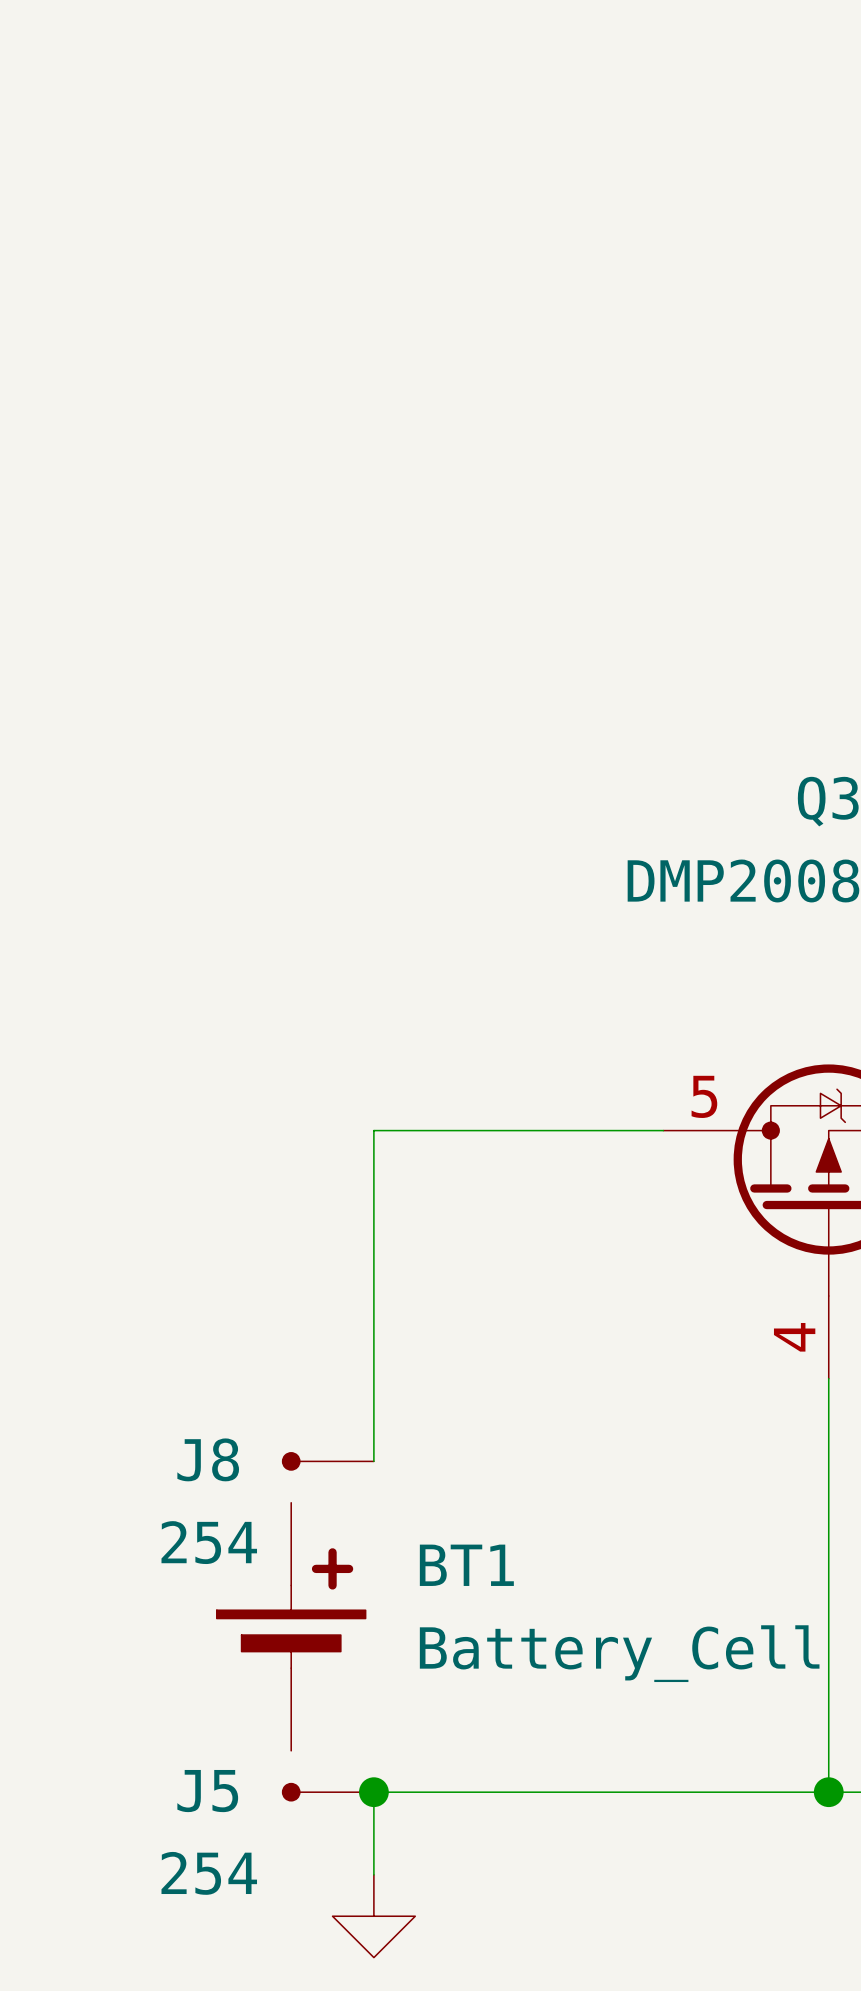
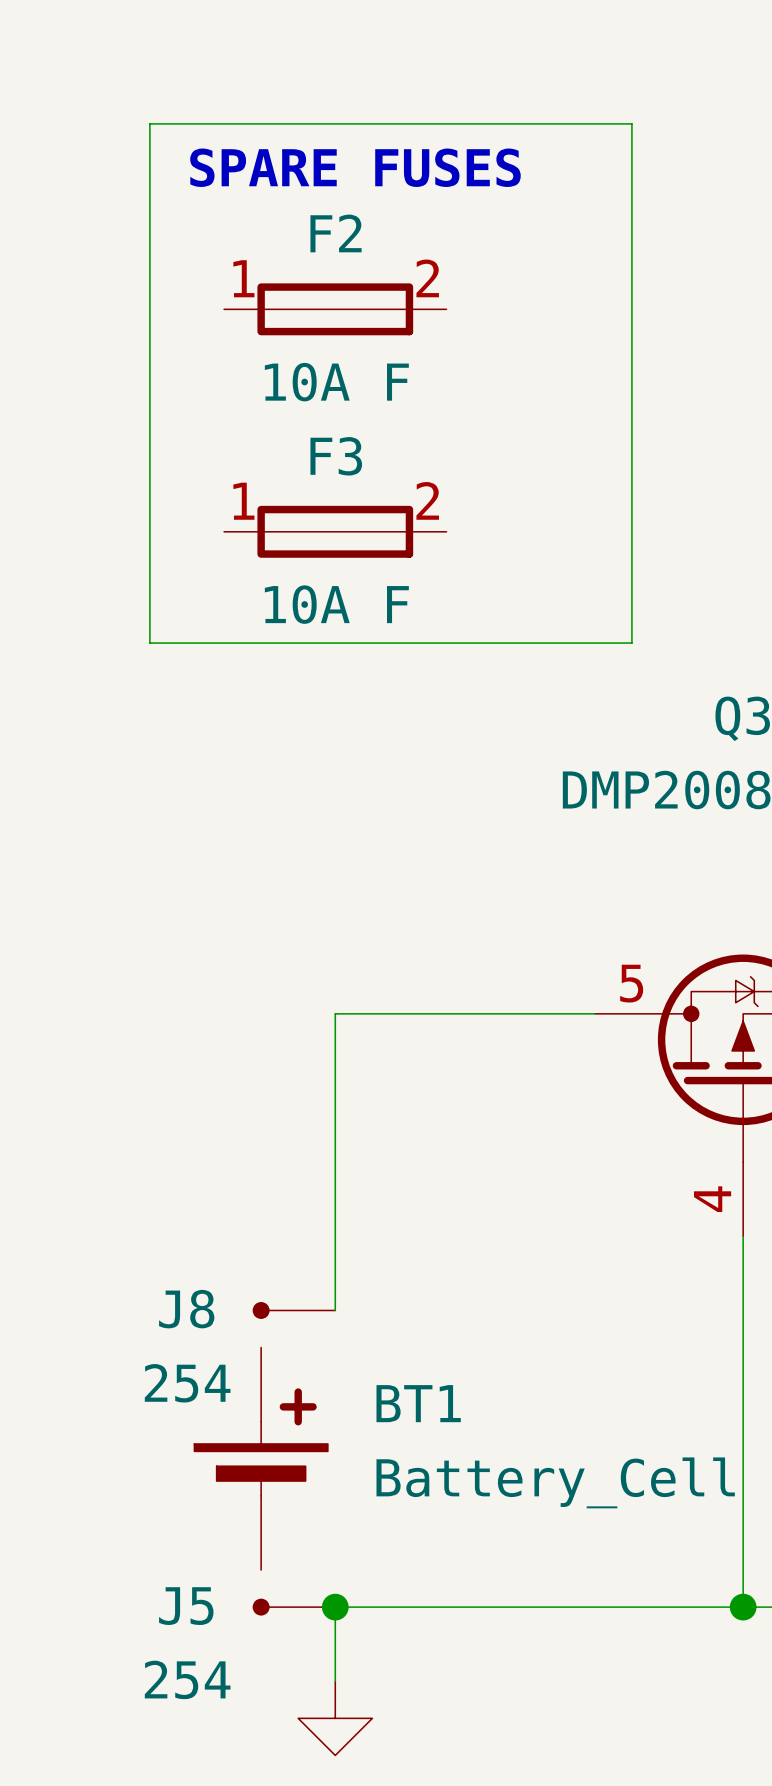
wire: none -> (149, 123) (149, 643) (631, 643) (631, 123) (149, 123)
text: none -> SPARE FUSES (355, 167)
F2: none -> 10A F (335, 309)
F3: none -> 10A F (335, 531)

